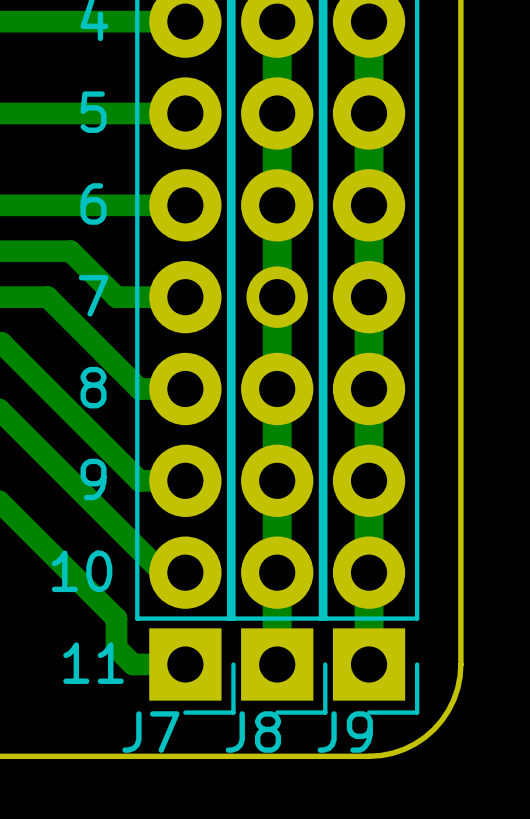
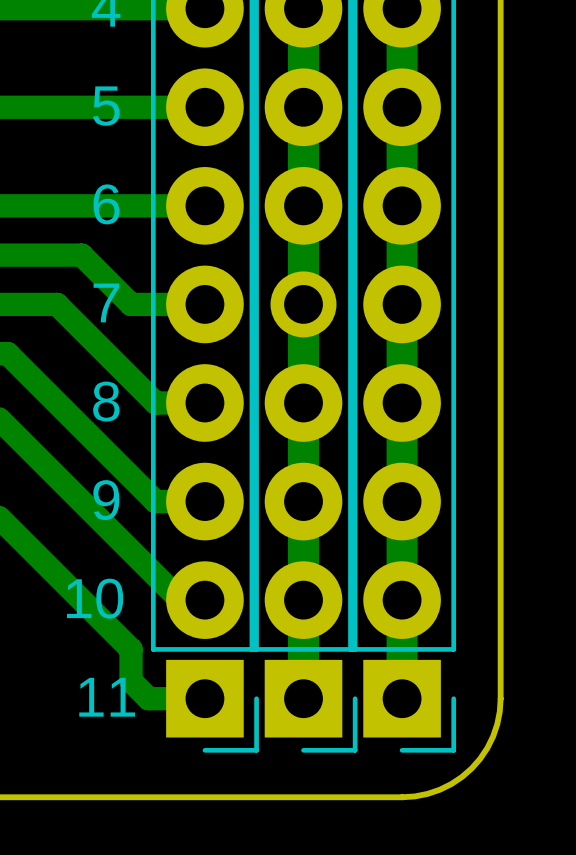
J7 name: J7 (150, 732) -> none
J8 name: J8 (253, 732) -> none
J9 name: J9 (345, 732) -> none

